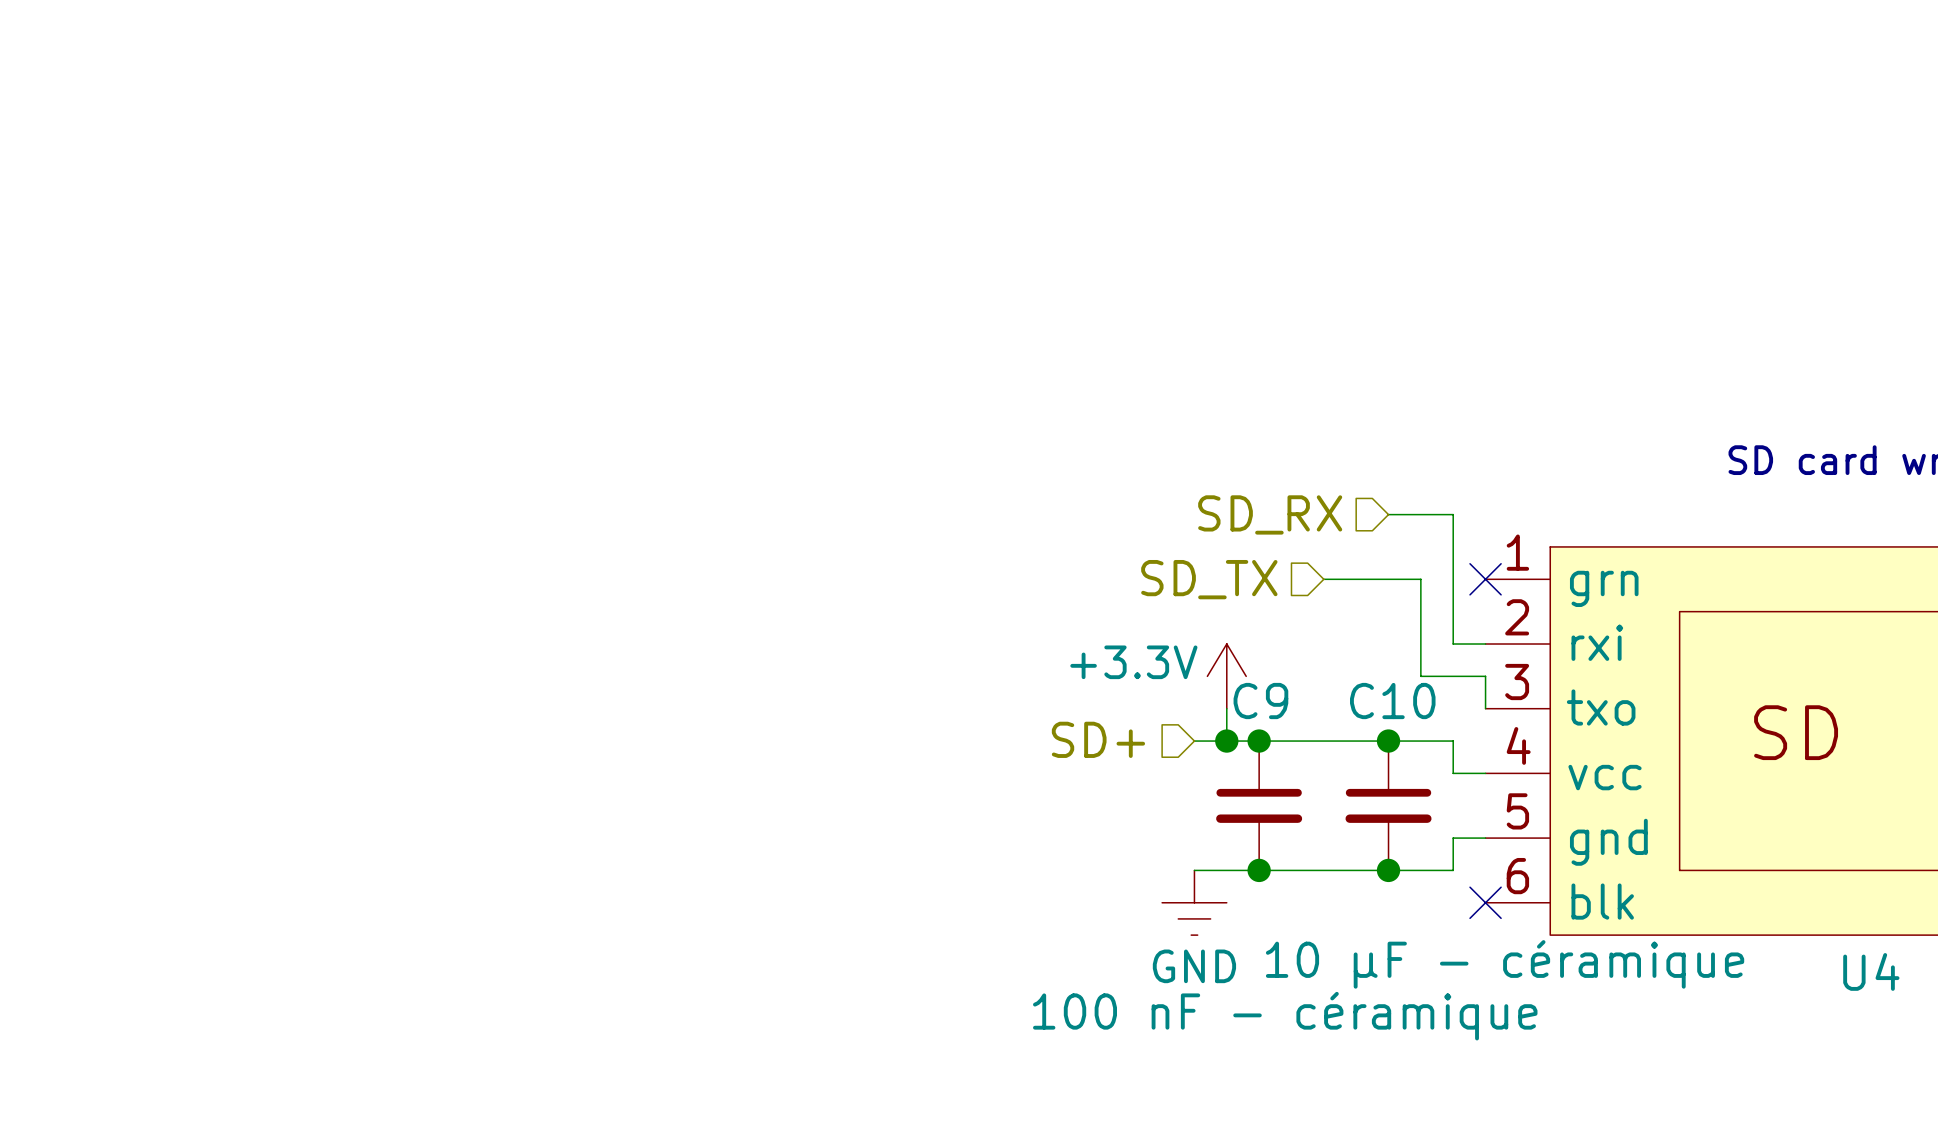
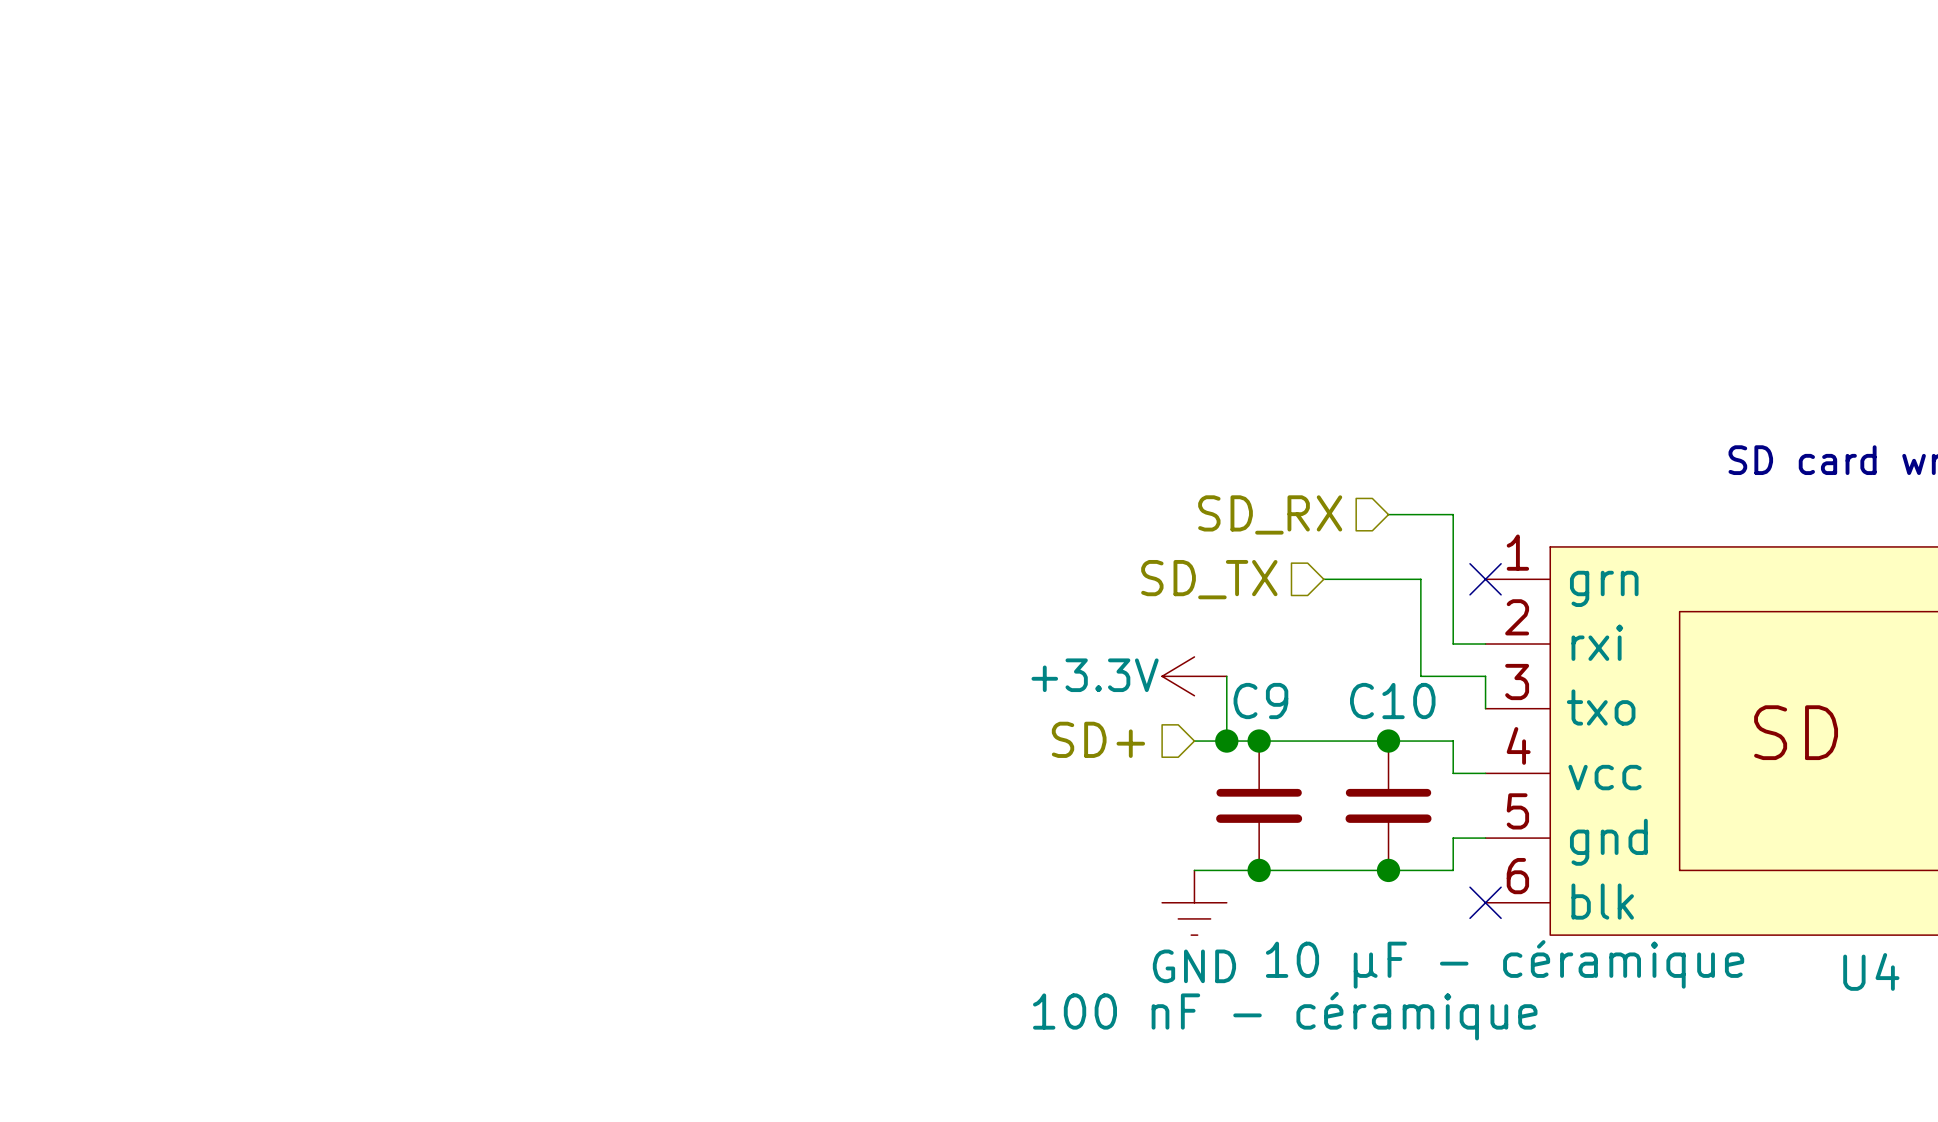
power symbol rotation: 0° (1226, 676) -> 90° counterclockwise (1194, 676)

